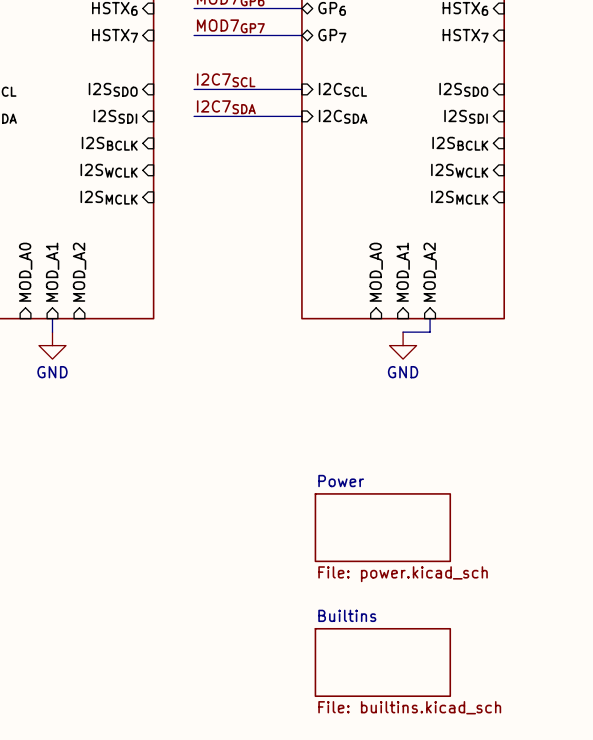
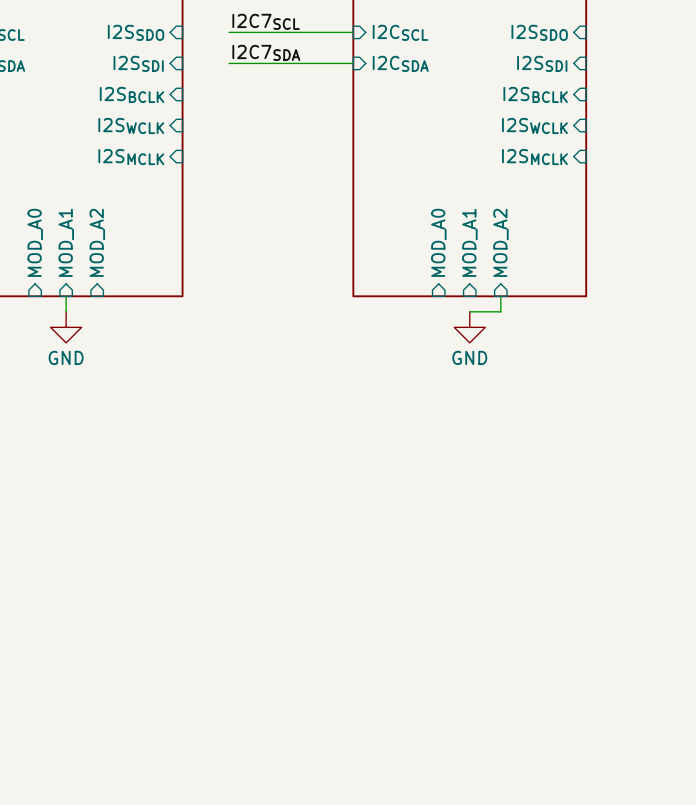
sheet Power: File: power.kicad_sch (382, 527) -> none
sheet Builtins: File: builtins.kicad_sch (382, 662) -> none

